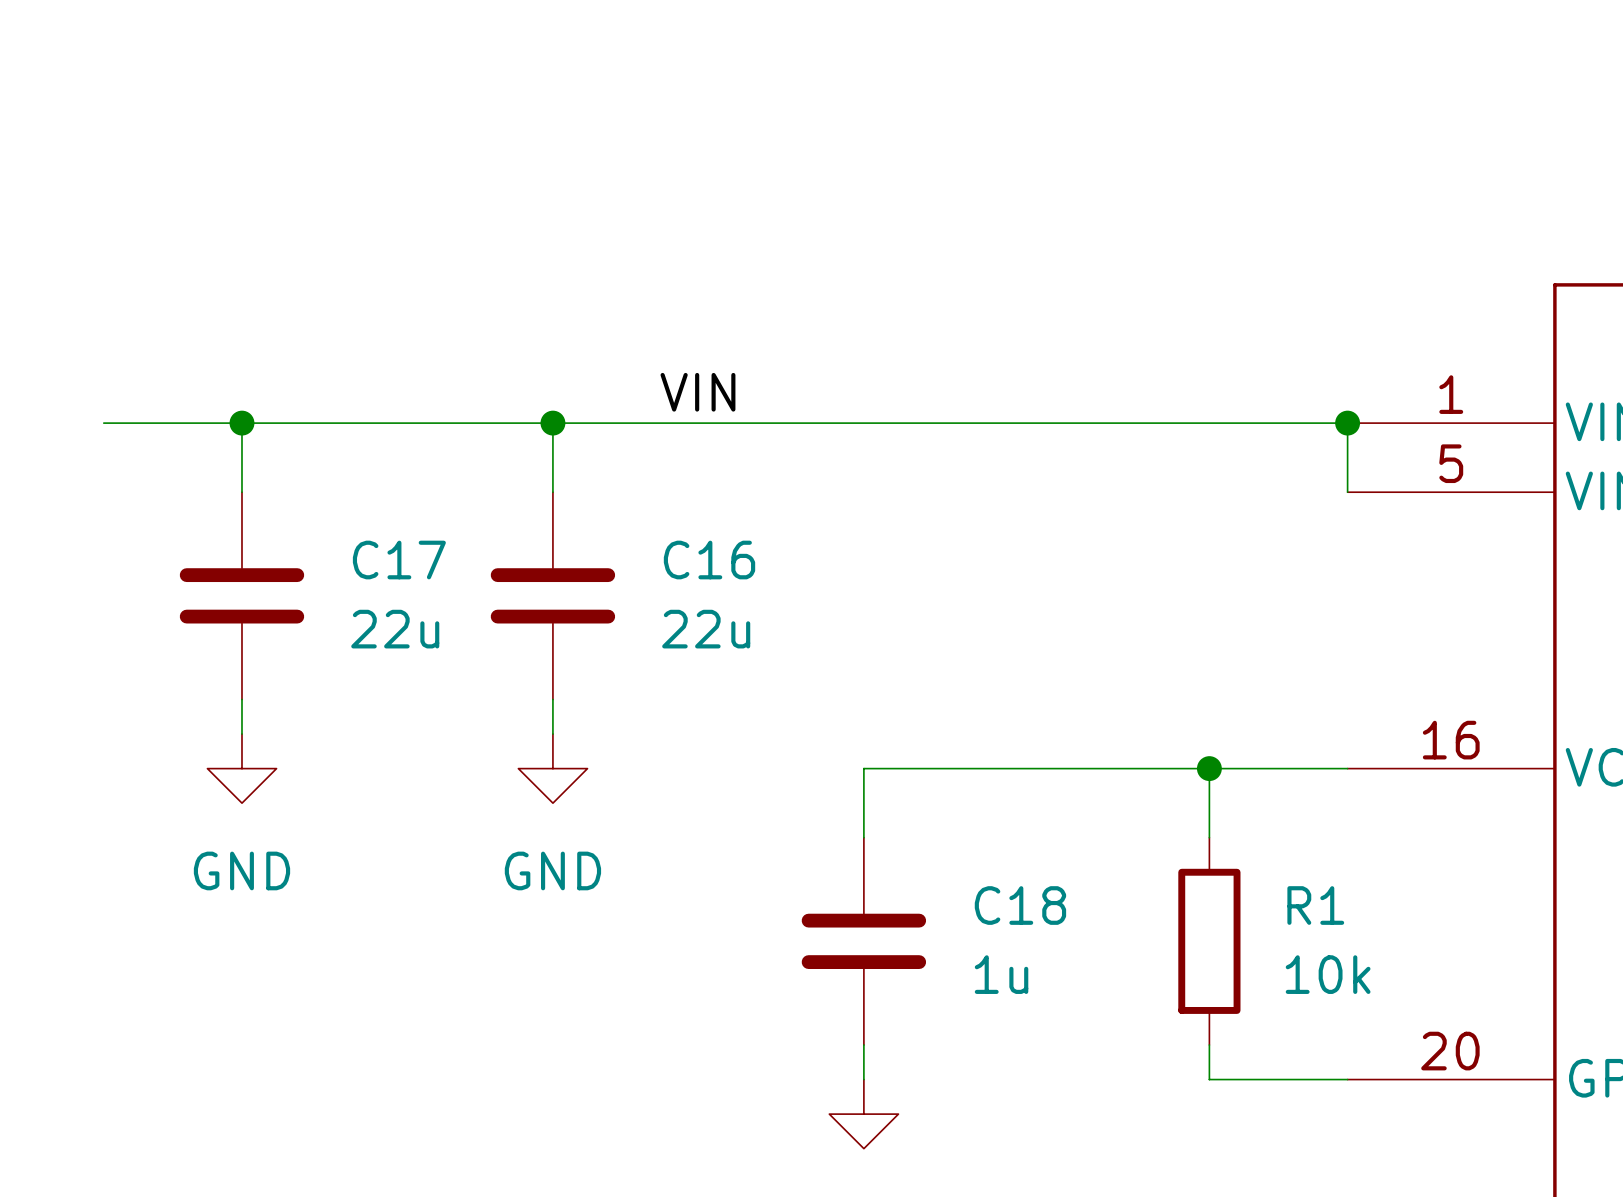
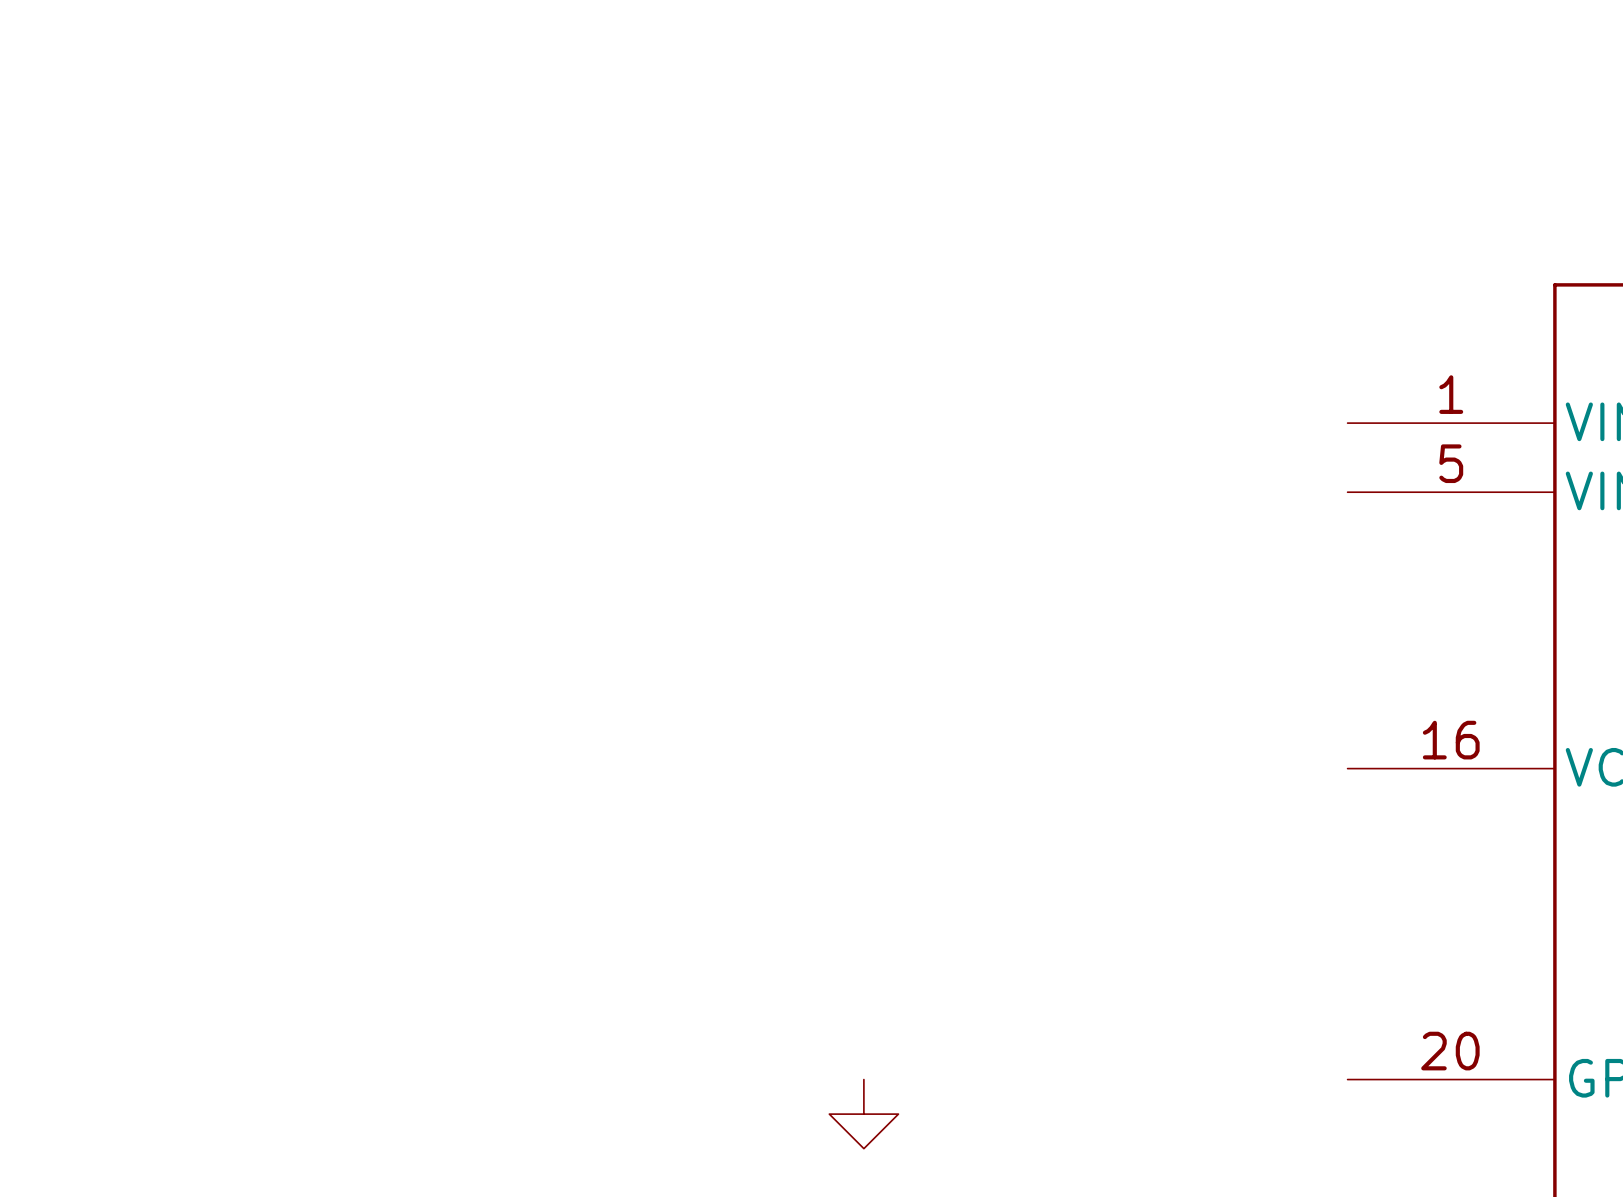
label: VIN (697, 392) -> none
wire: (103, 423) (1347, 423) (1347, 492) -> none
wire: (241, 423) (241, 492) -> none
junction: (241, 423) -> none
wire: (552, 423) (552, 492) -> none
junction: (552, 423) -> none
junction: (1347, 423) -> none
C17: 22u (241, 595) -> none
C16: 22u (552, 595) -> none
wire: (241, 699) (241, 734) -> none
wire: (552, 699) (552, 734) -> none
power symbol: GND (241, 768) -> none
power symbol: GND (552, 768) -> none
wire: (1209, 768) (1209, 837) -> none
junction: (1209, 768) -> none
wire: (1347, 768) (863, 768) (863, 837) -> none
C18: 1u (863, 941) -> none
R1: 10k (1209, 941) -> none
wire: (863, 1045) (863, 1079) -> none
wire: (1209, 1045) (1209, 1079) (1347, 1079) -> none

